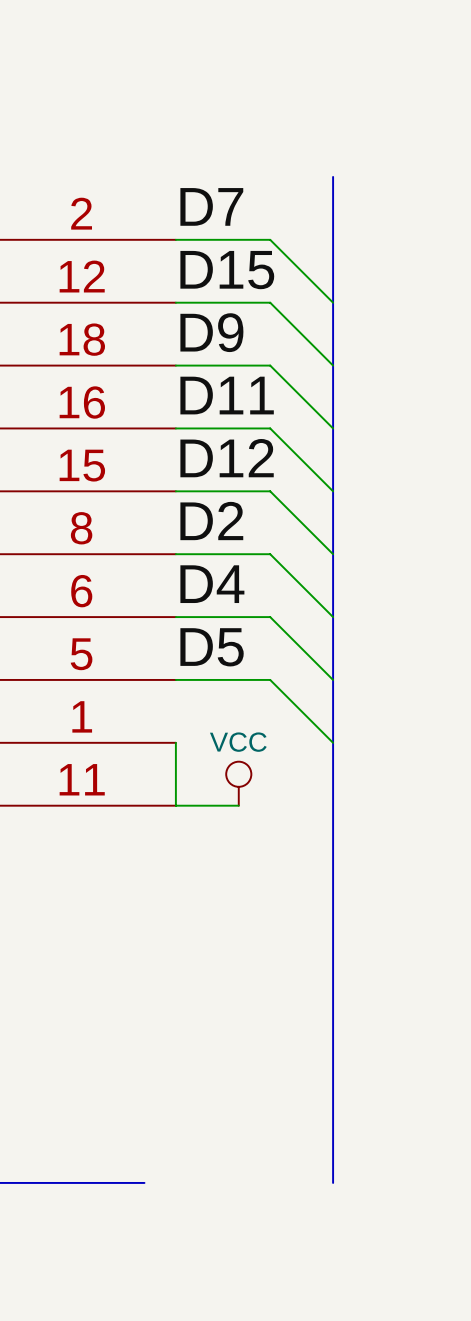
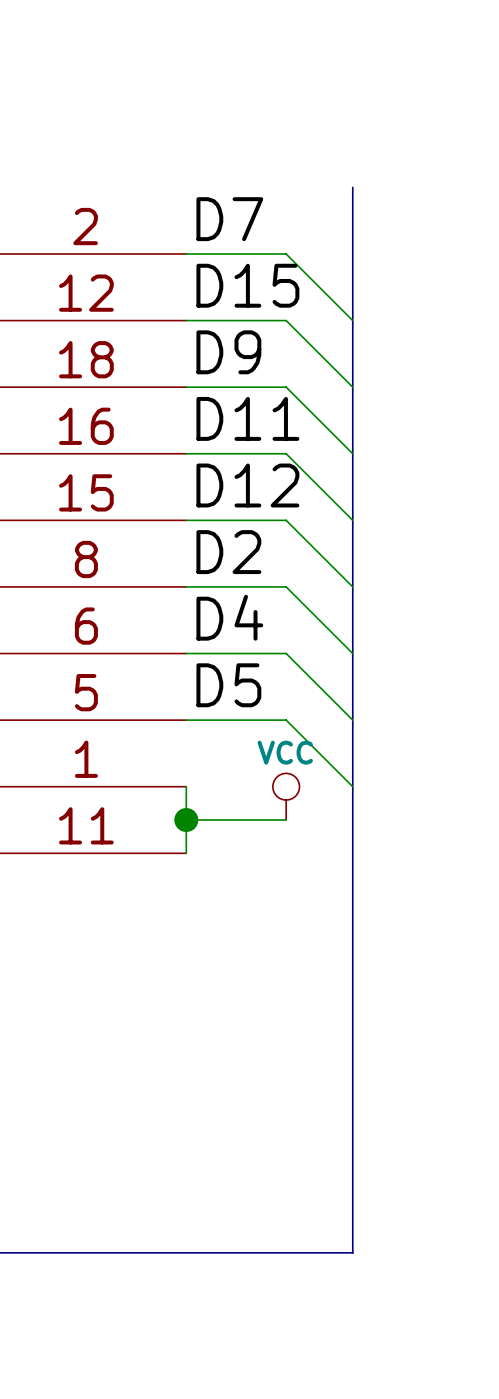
wire: none -> (186, 820) (286, 820)
junction: none -> (186, 820)
power symbol position: VCC (238, 783) -> VCC (286, 796)
wire: (175, 805) (238, 805) -> none
bus: none -> (153, 1252) (352, 1252)

